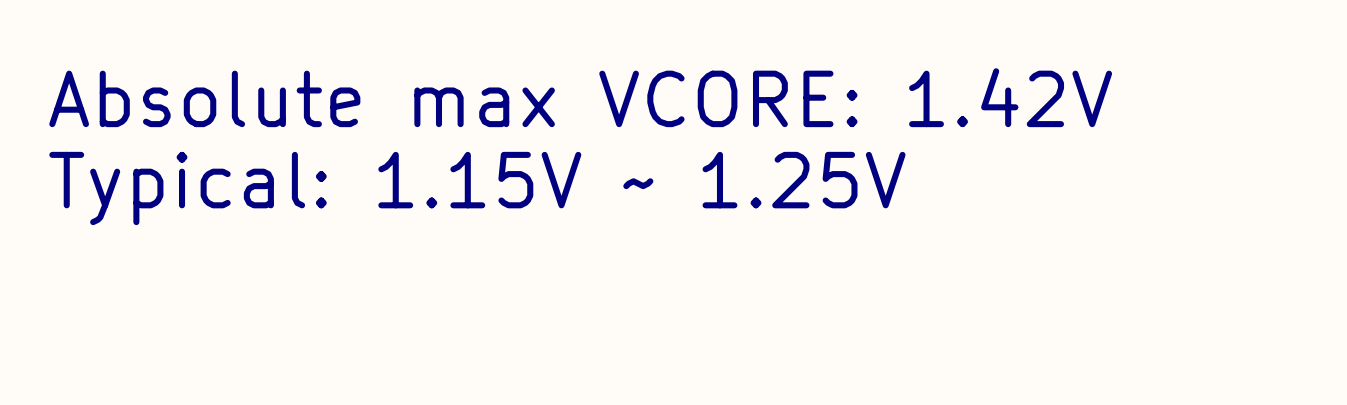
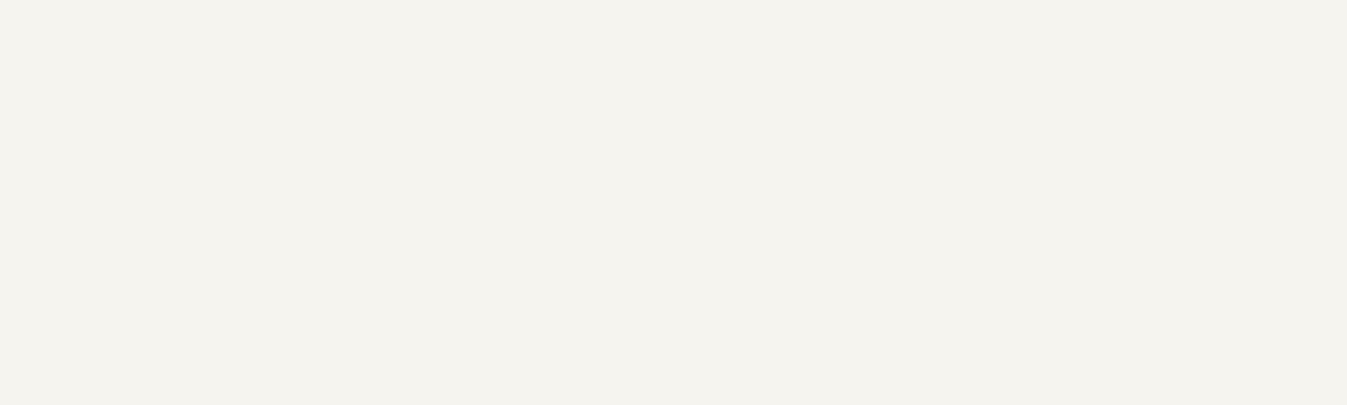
text: Absolute max VCORE: 1.42V (580, 97) -> none
text: Typical: 1.15V ~ 1.25V (477, 188) -> none

